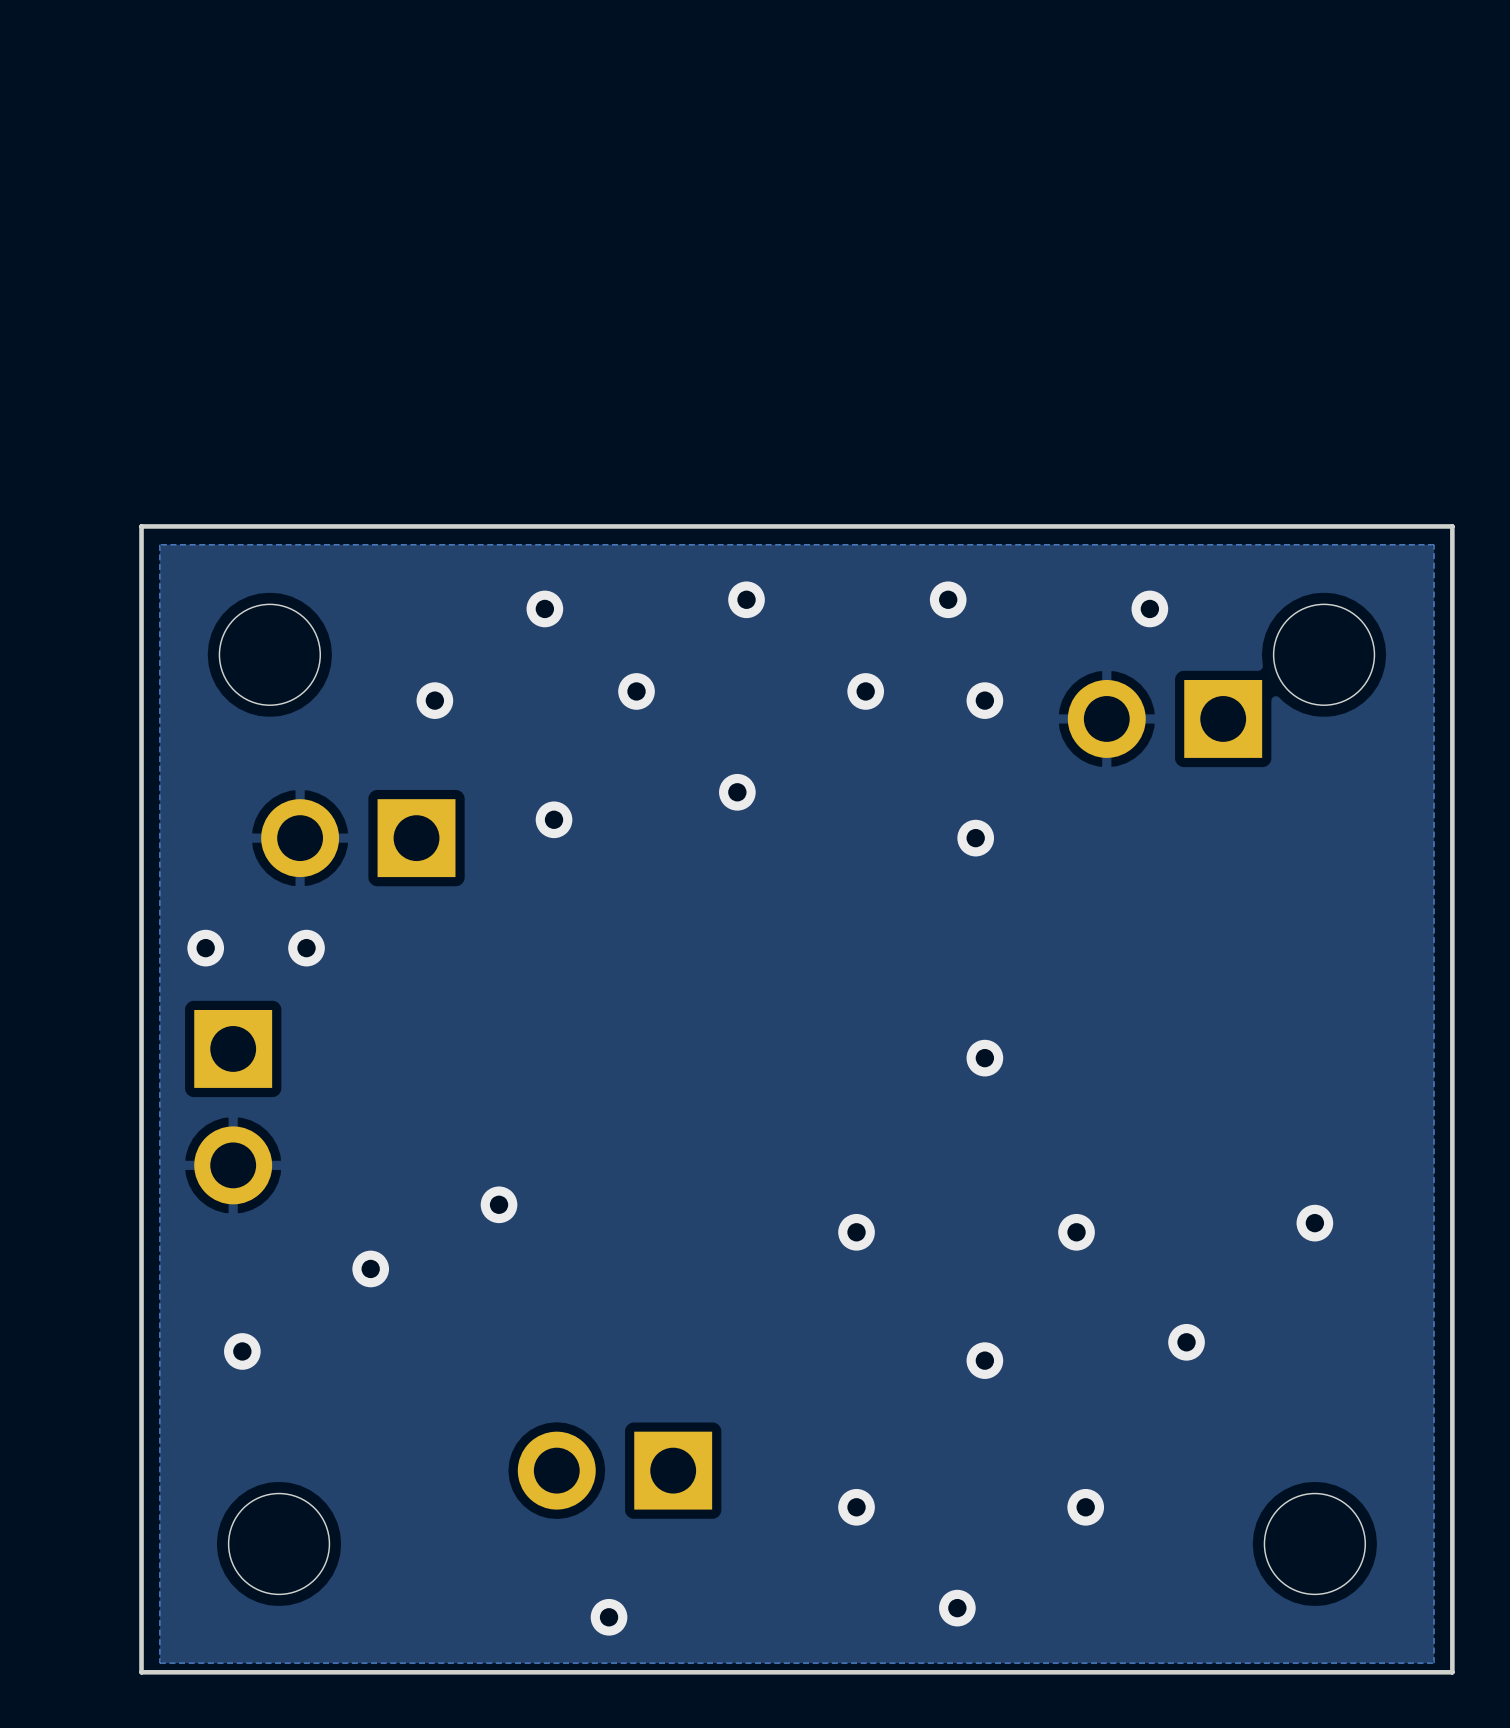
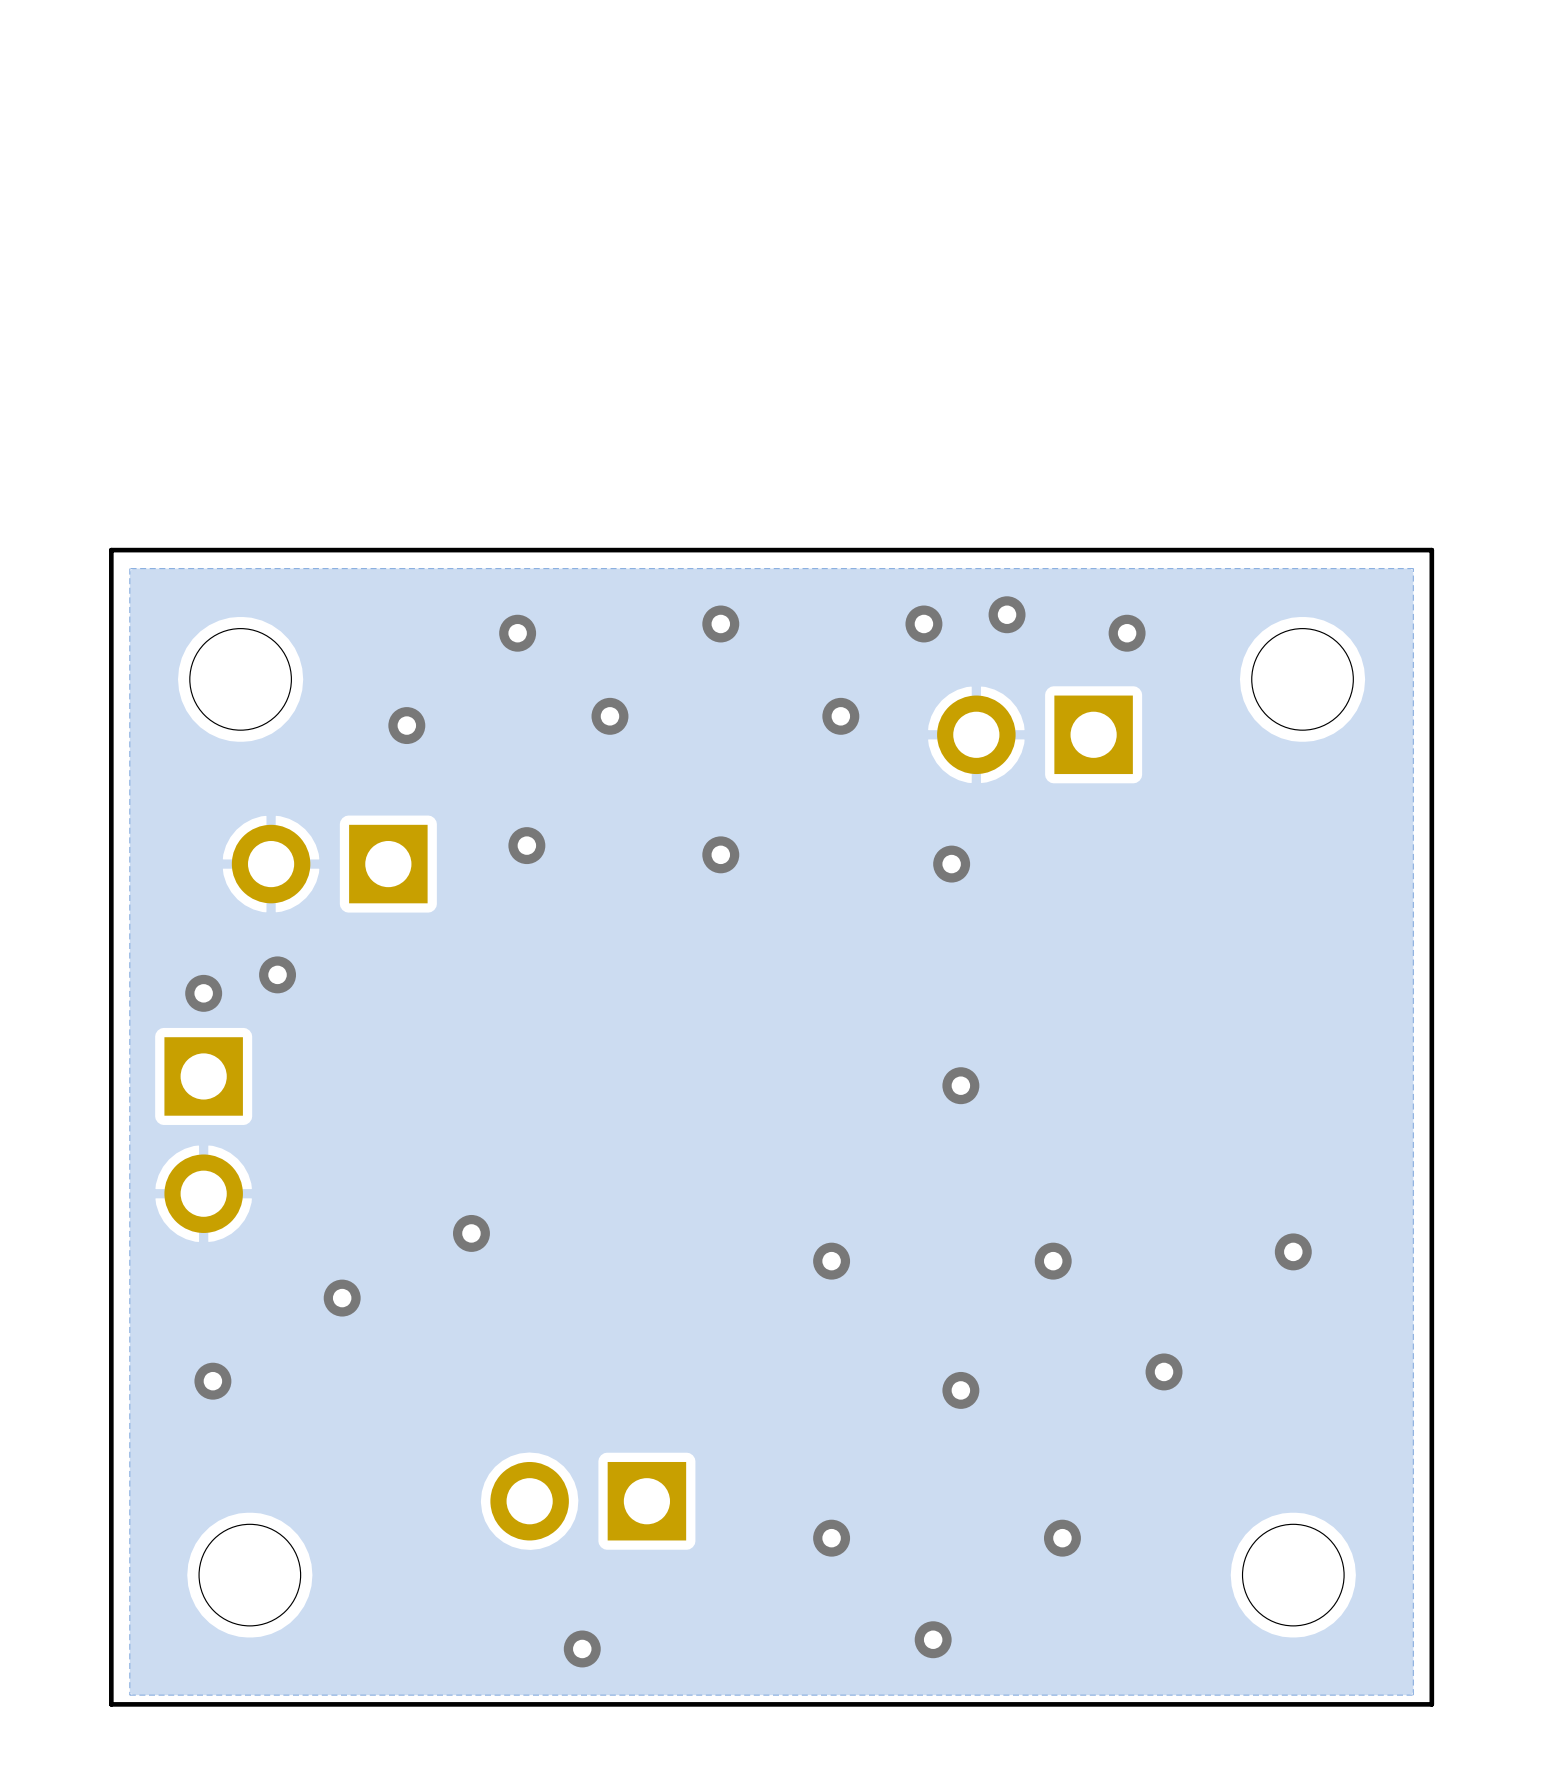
via position: (984, 700) -> (1007, 614)
part position: (1164, 718) -> (1034, 734)
via position: (737, 792) -> (720, 854)
via position: (205, 948) -> (203, 993)

